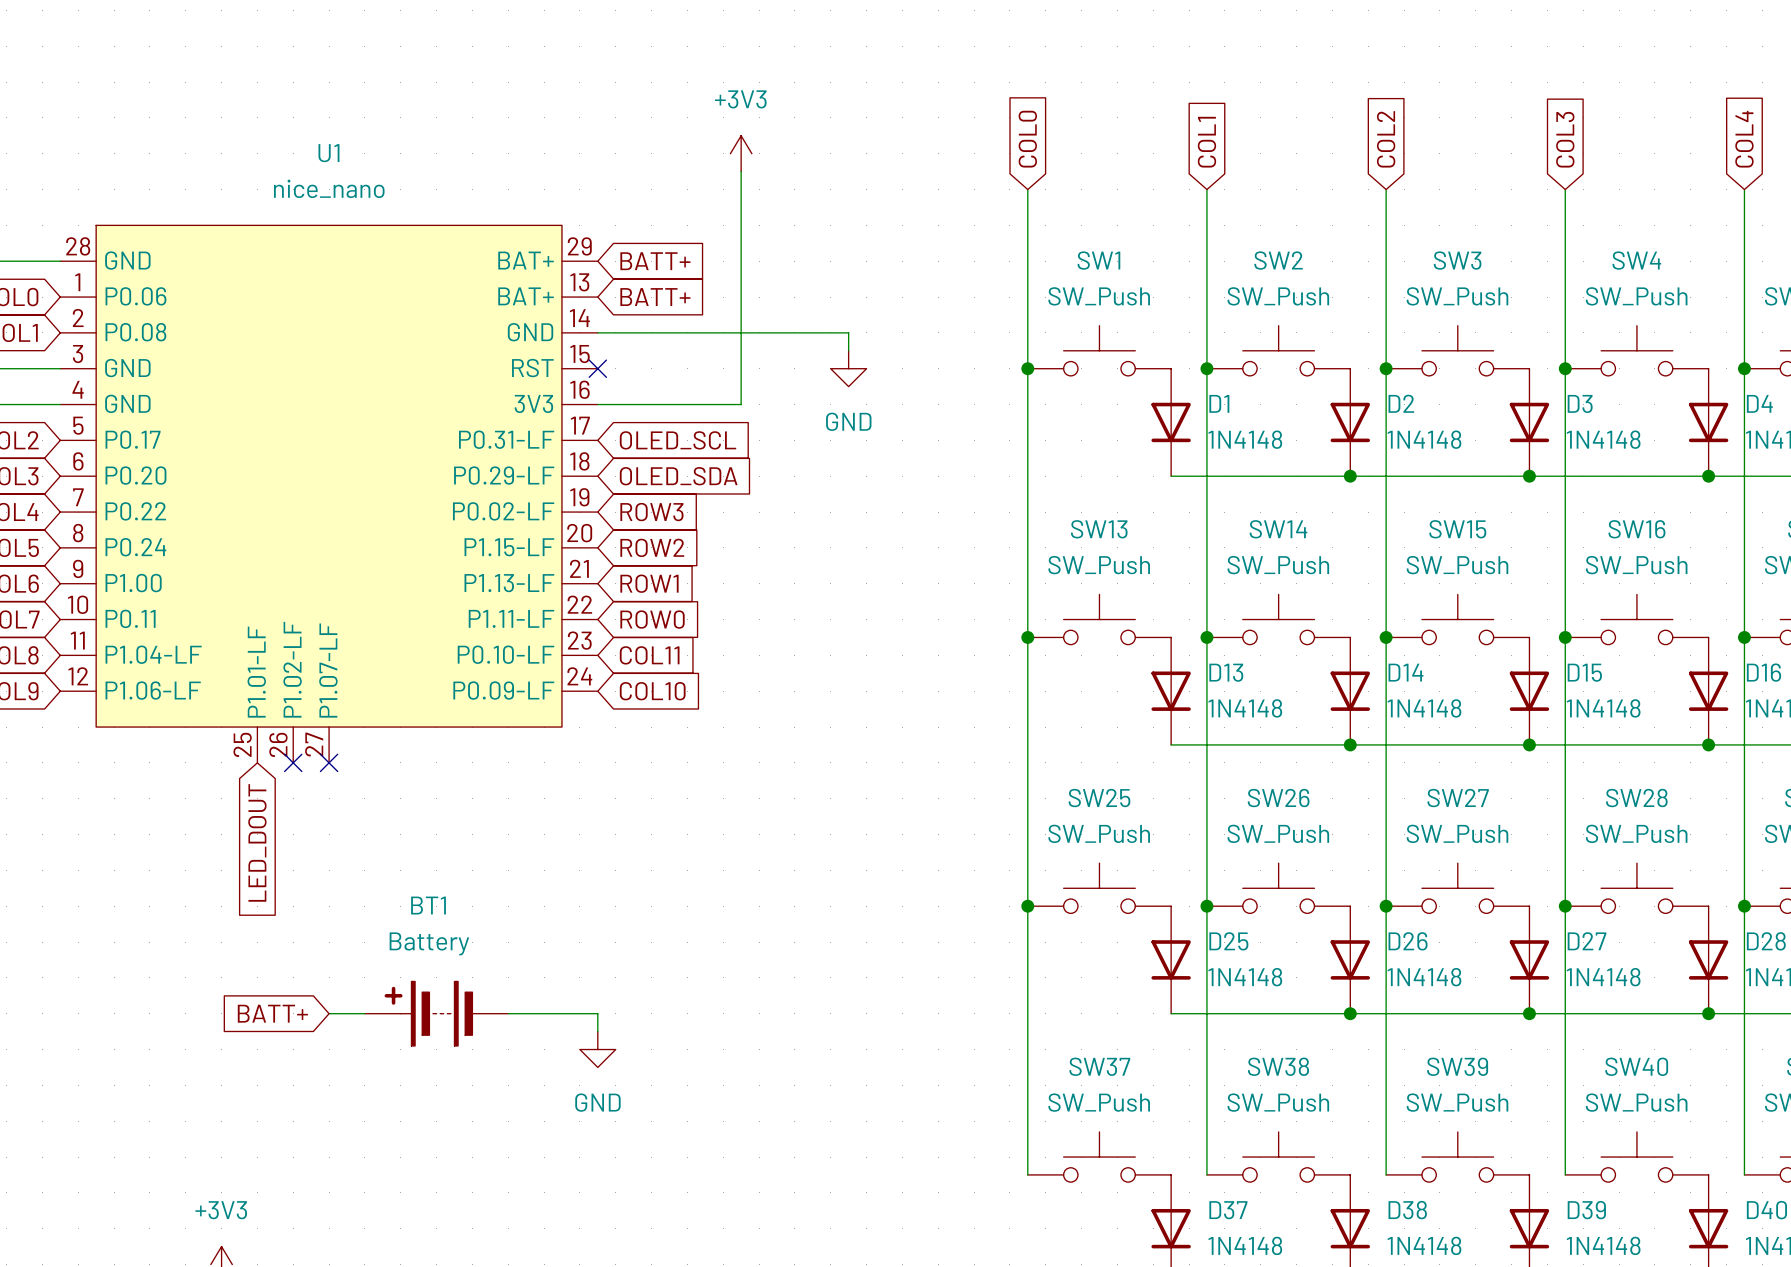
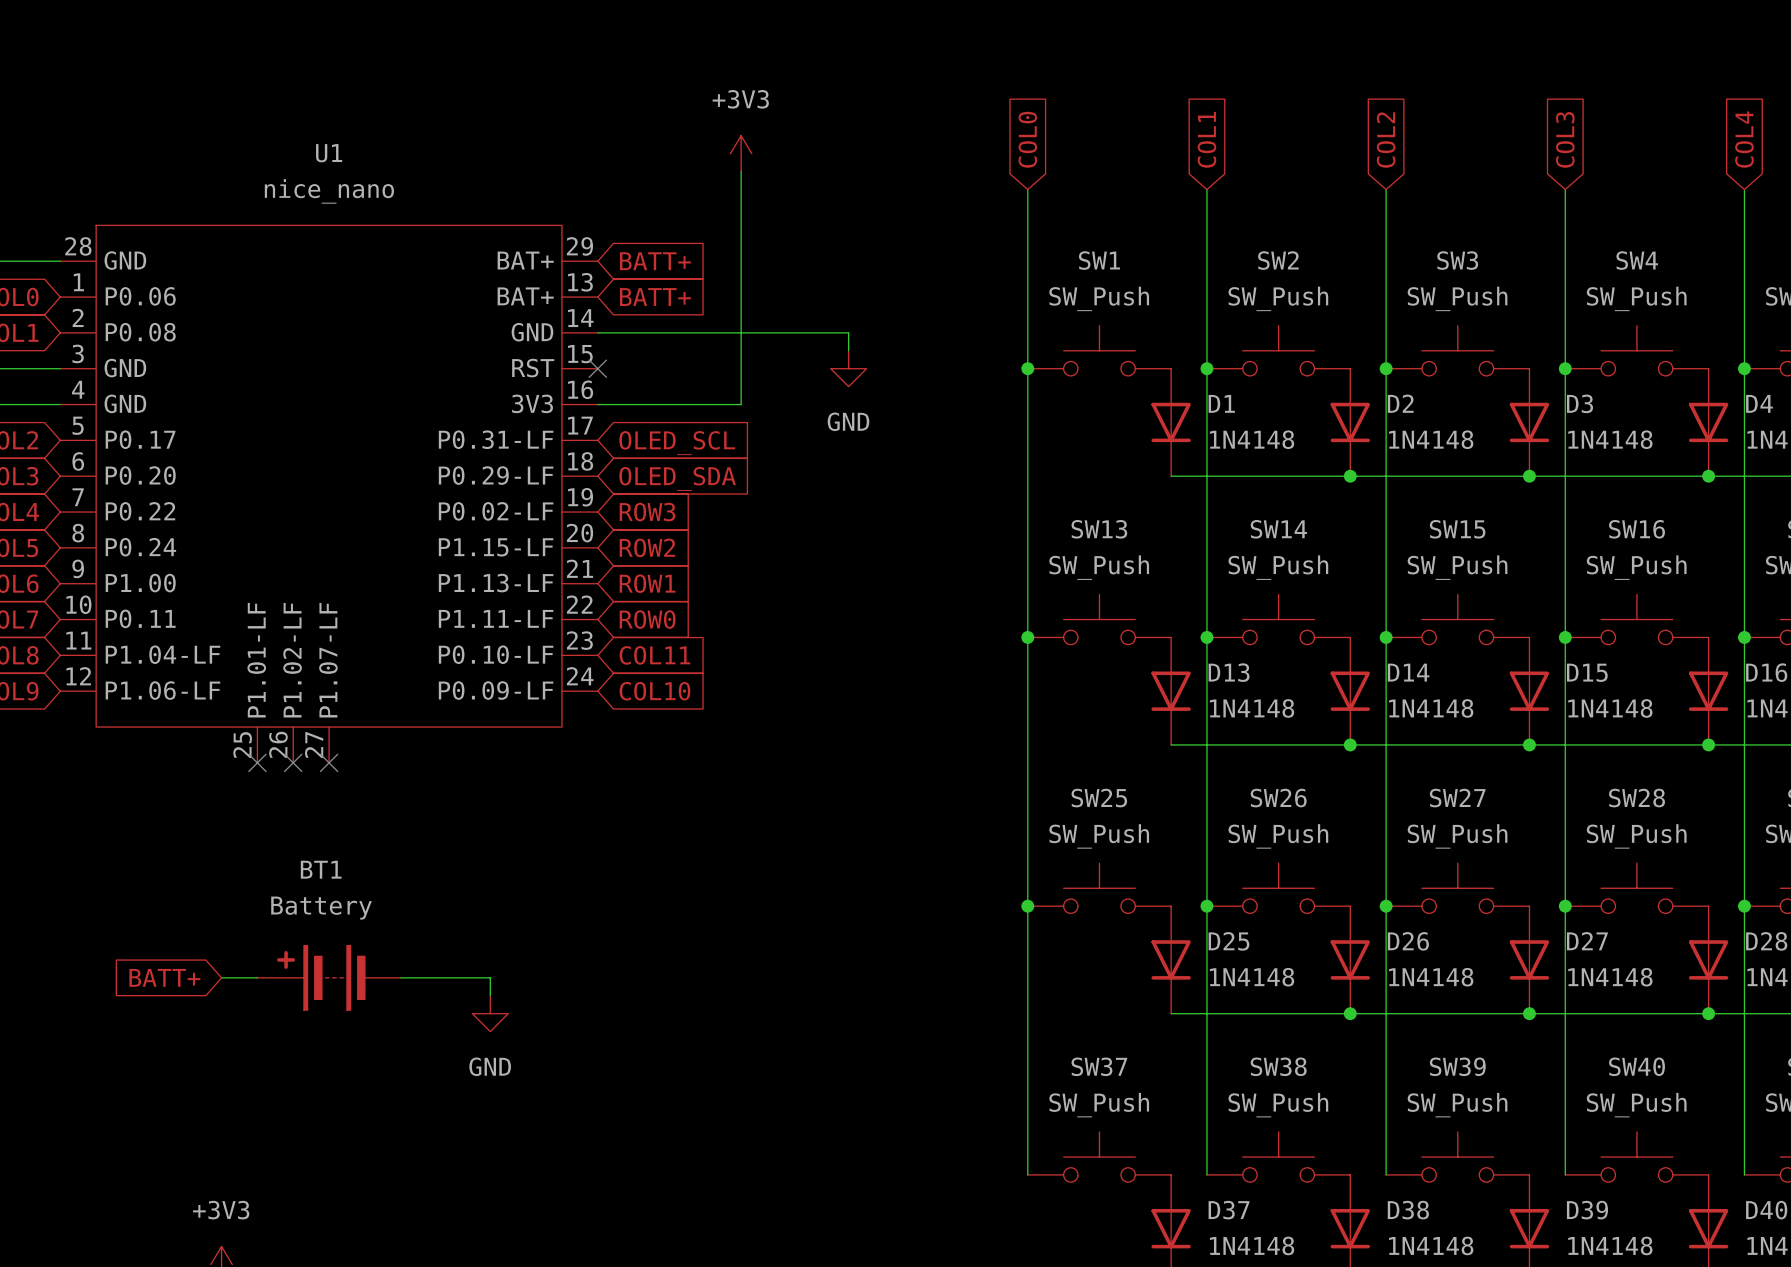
no-connect mark: none -> (257, 762)
global label: LED_DOUT (257, 842) -> none
global label position: BATT+ (272, 1013) -> BATT+ (164, 977)
wire: (329, 1013) (364, 1013) -> (221, 977) (257, 977)
BT1 position: (436, 1013) -> (329, 977)
wire: (508, 1013) (597, 1013) (597, 1031) -> (400, 977) (490, 977) (490, 995)
power symbol position: GND (597, 1049) -> GND (490, 1013)

